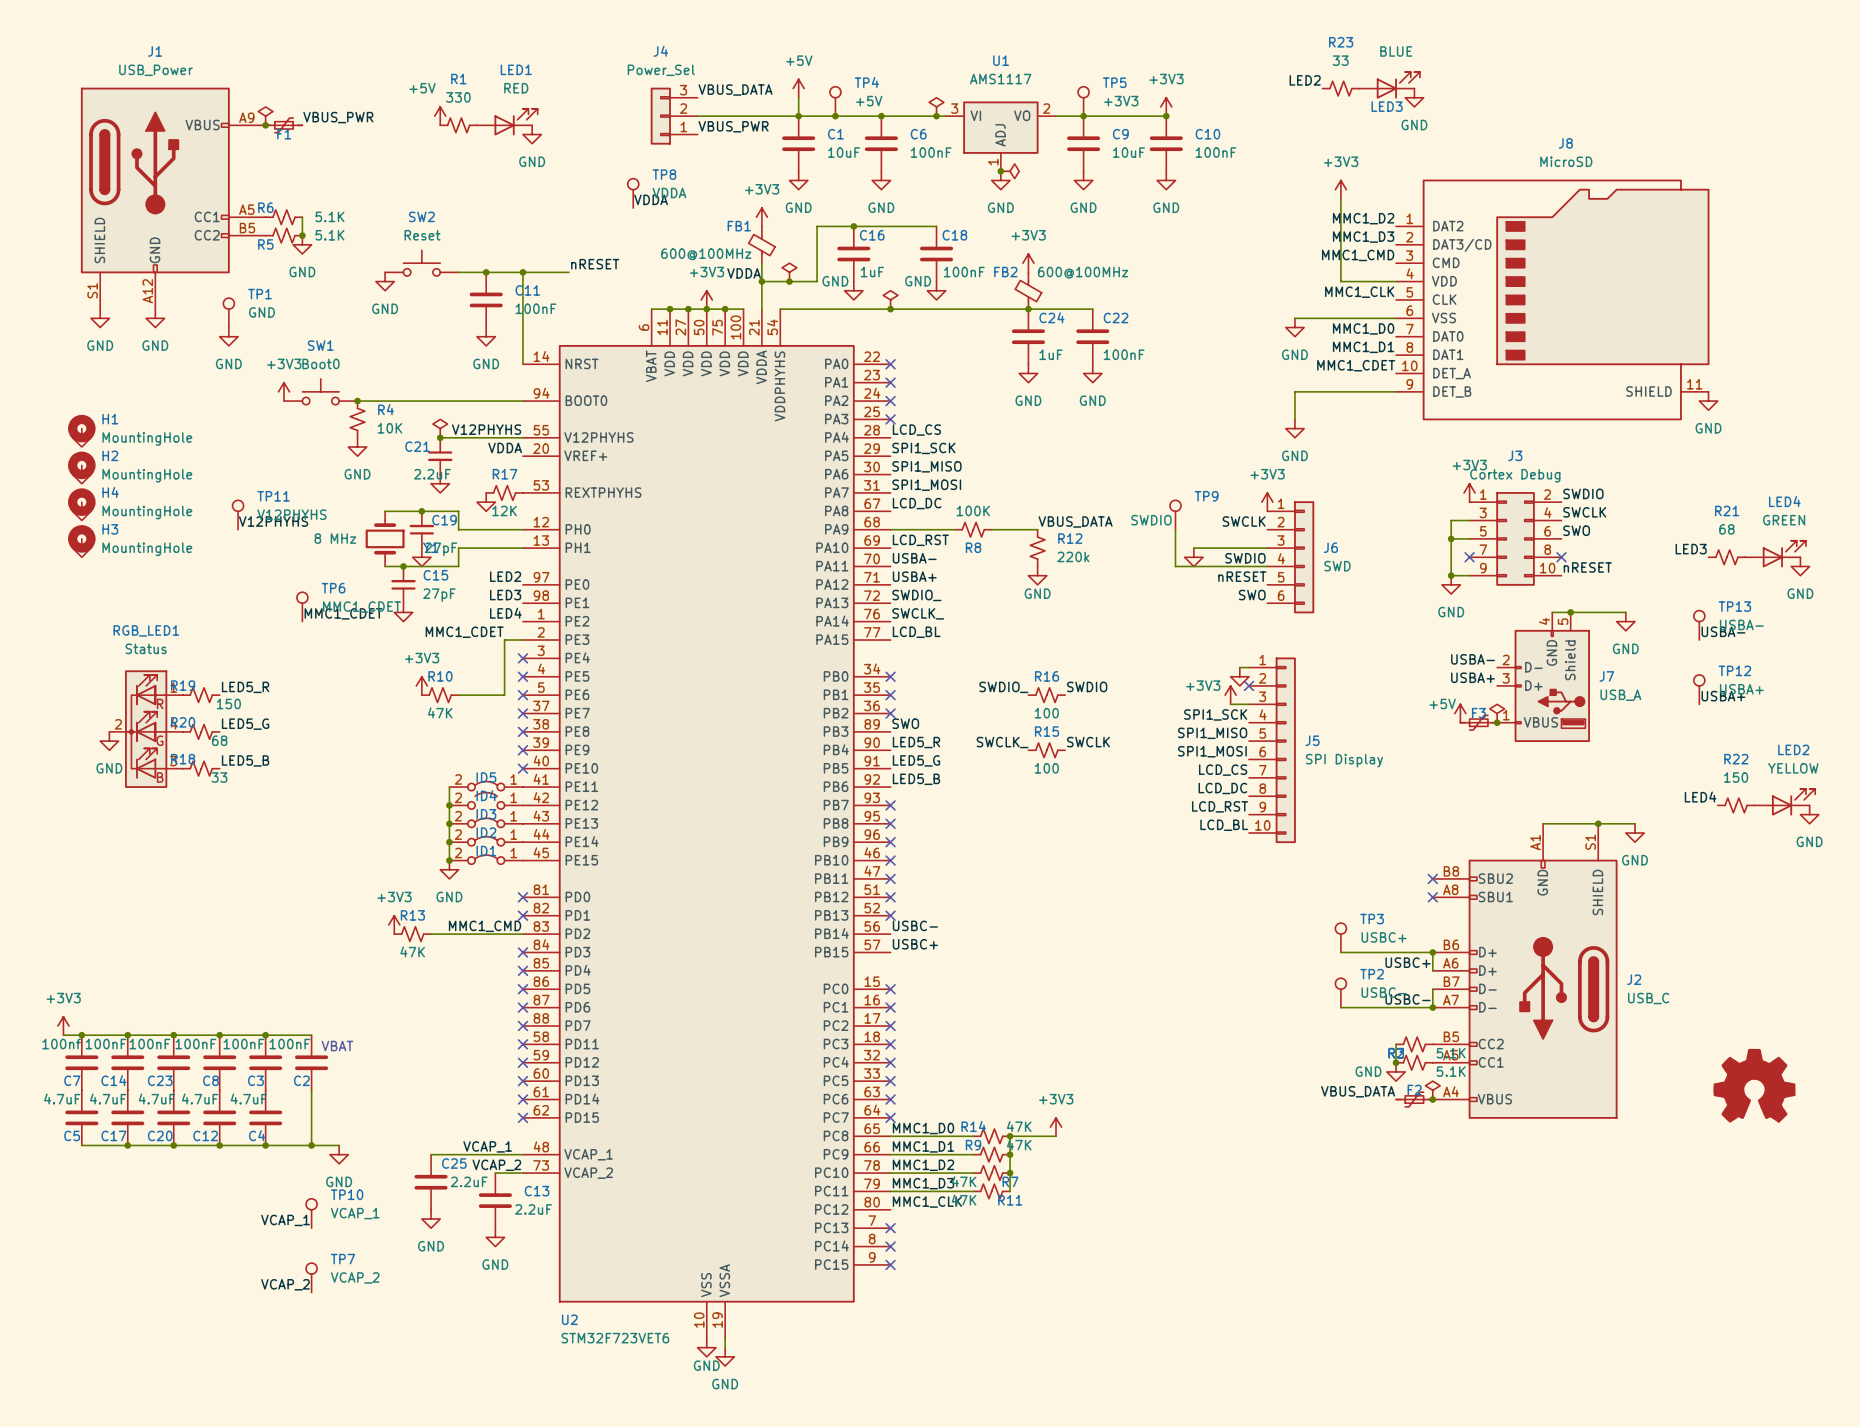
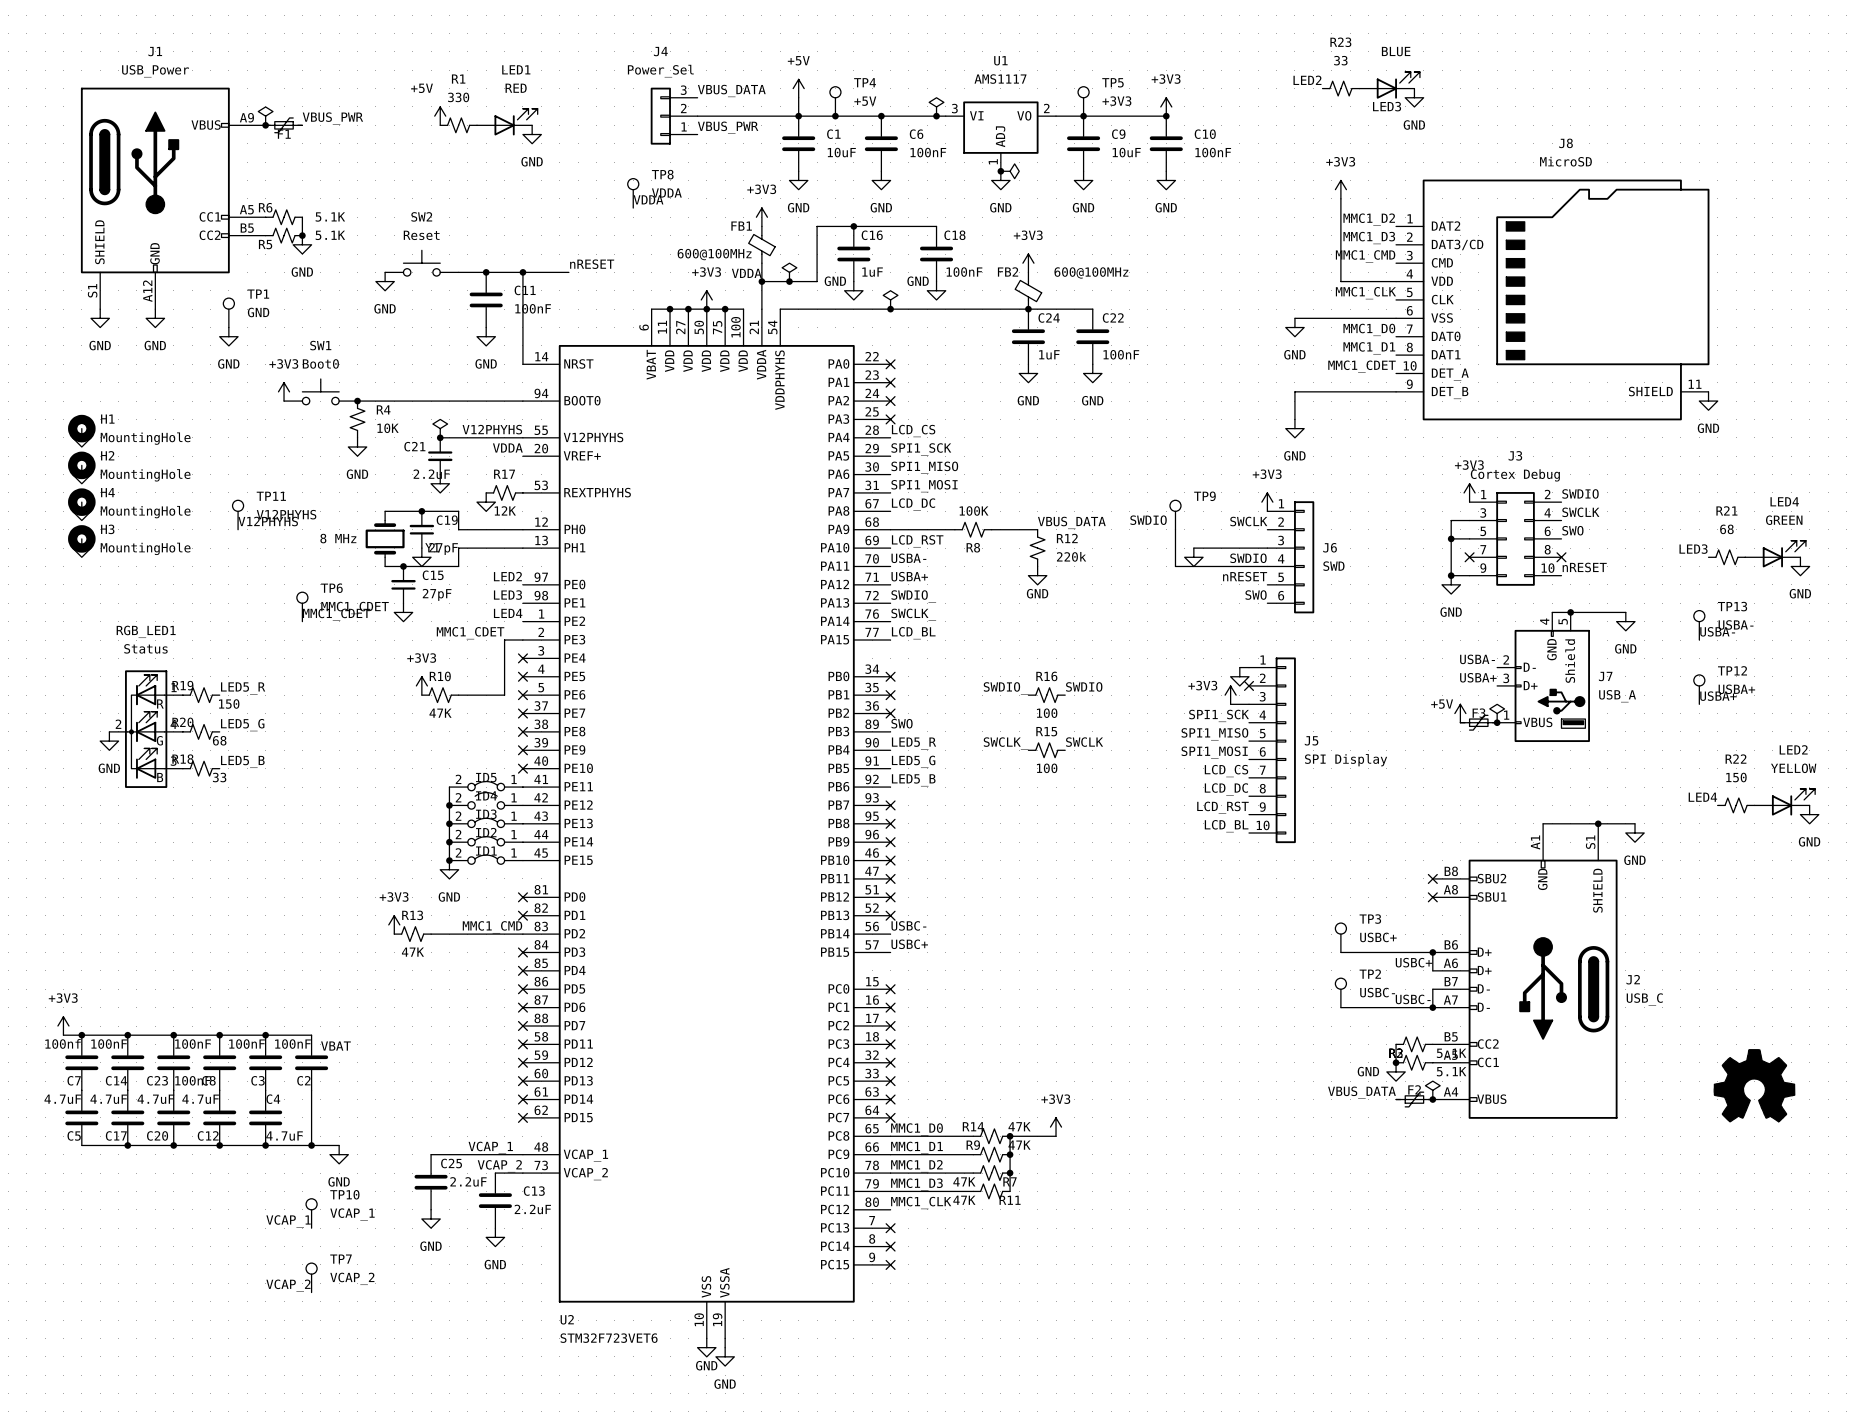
C23 value position: 100nF (149, 1044) -> 100nF (193, 1080)
C4 value position: 4.7uF (248, 1098) -> 4.7uF (284, 1136)
C4 name position: C4 (257, 1135) -> C4 (273, 1099)

